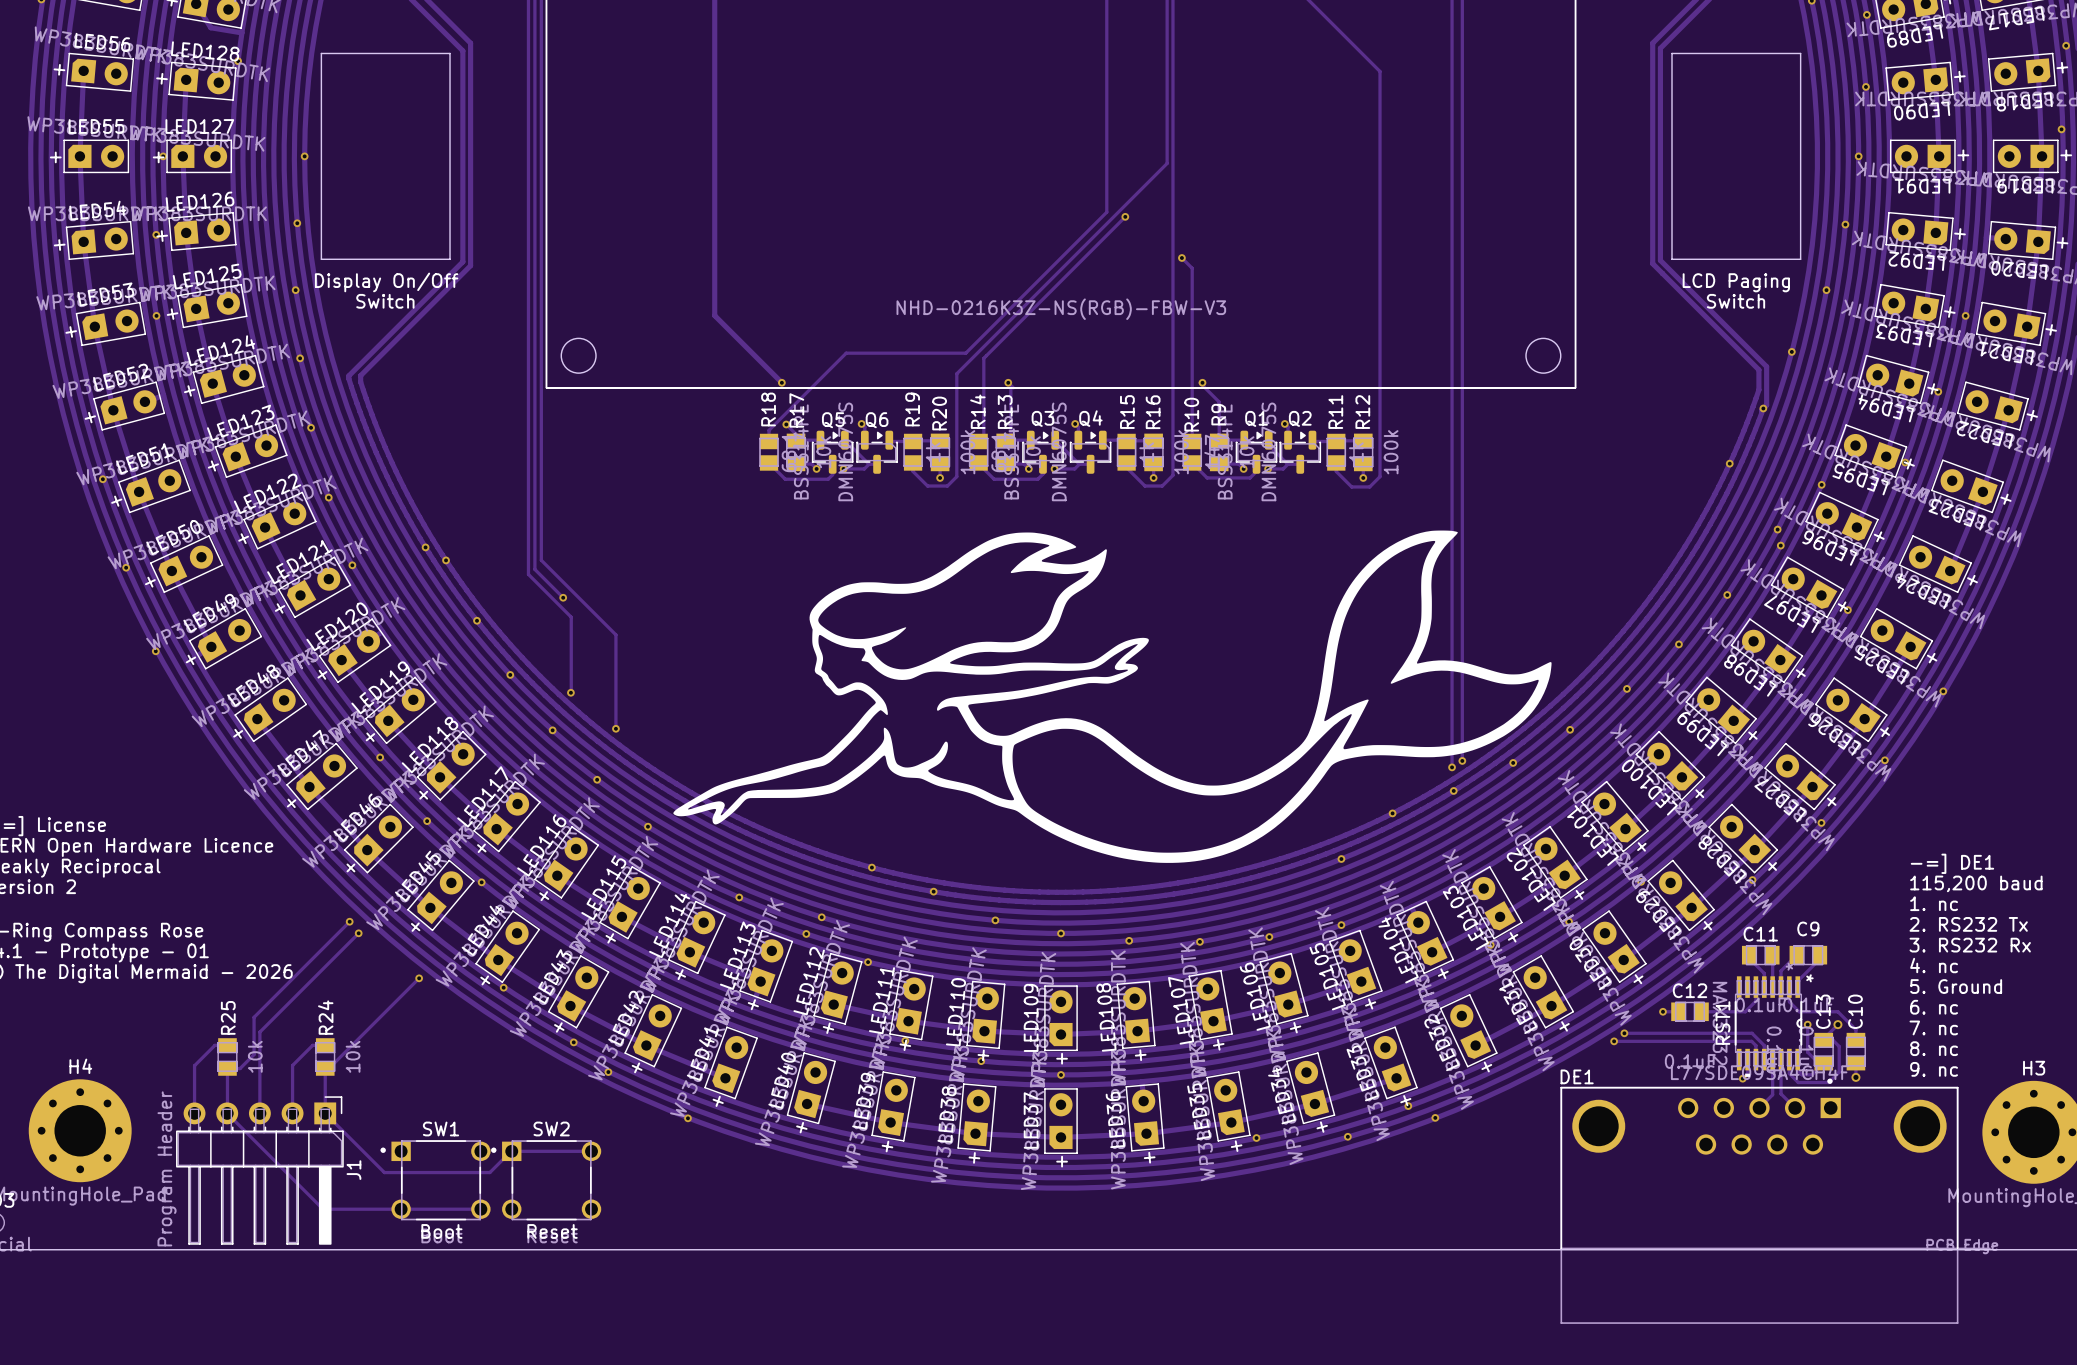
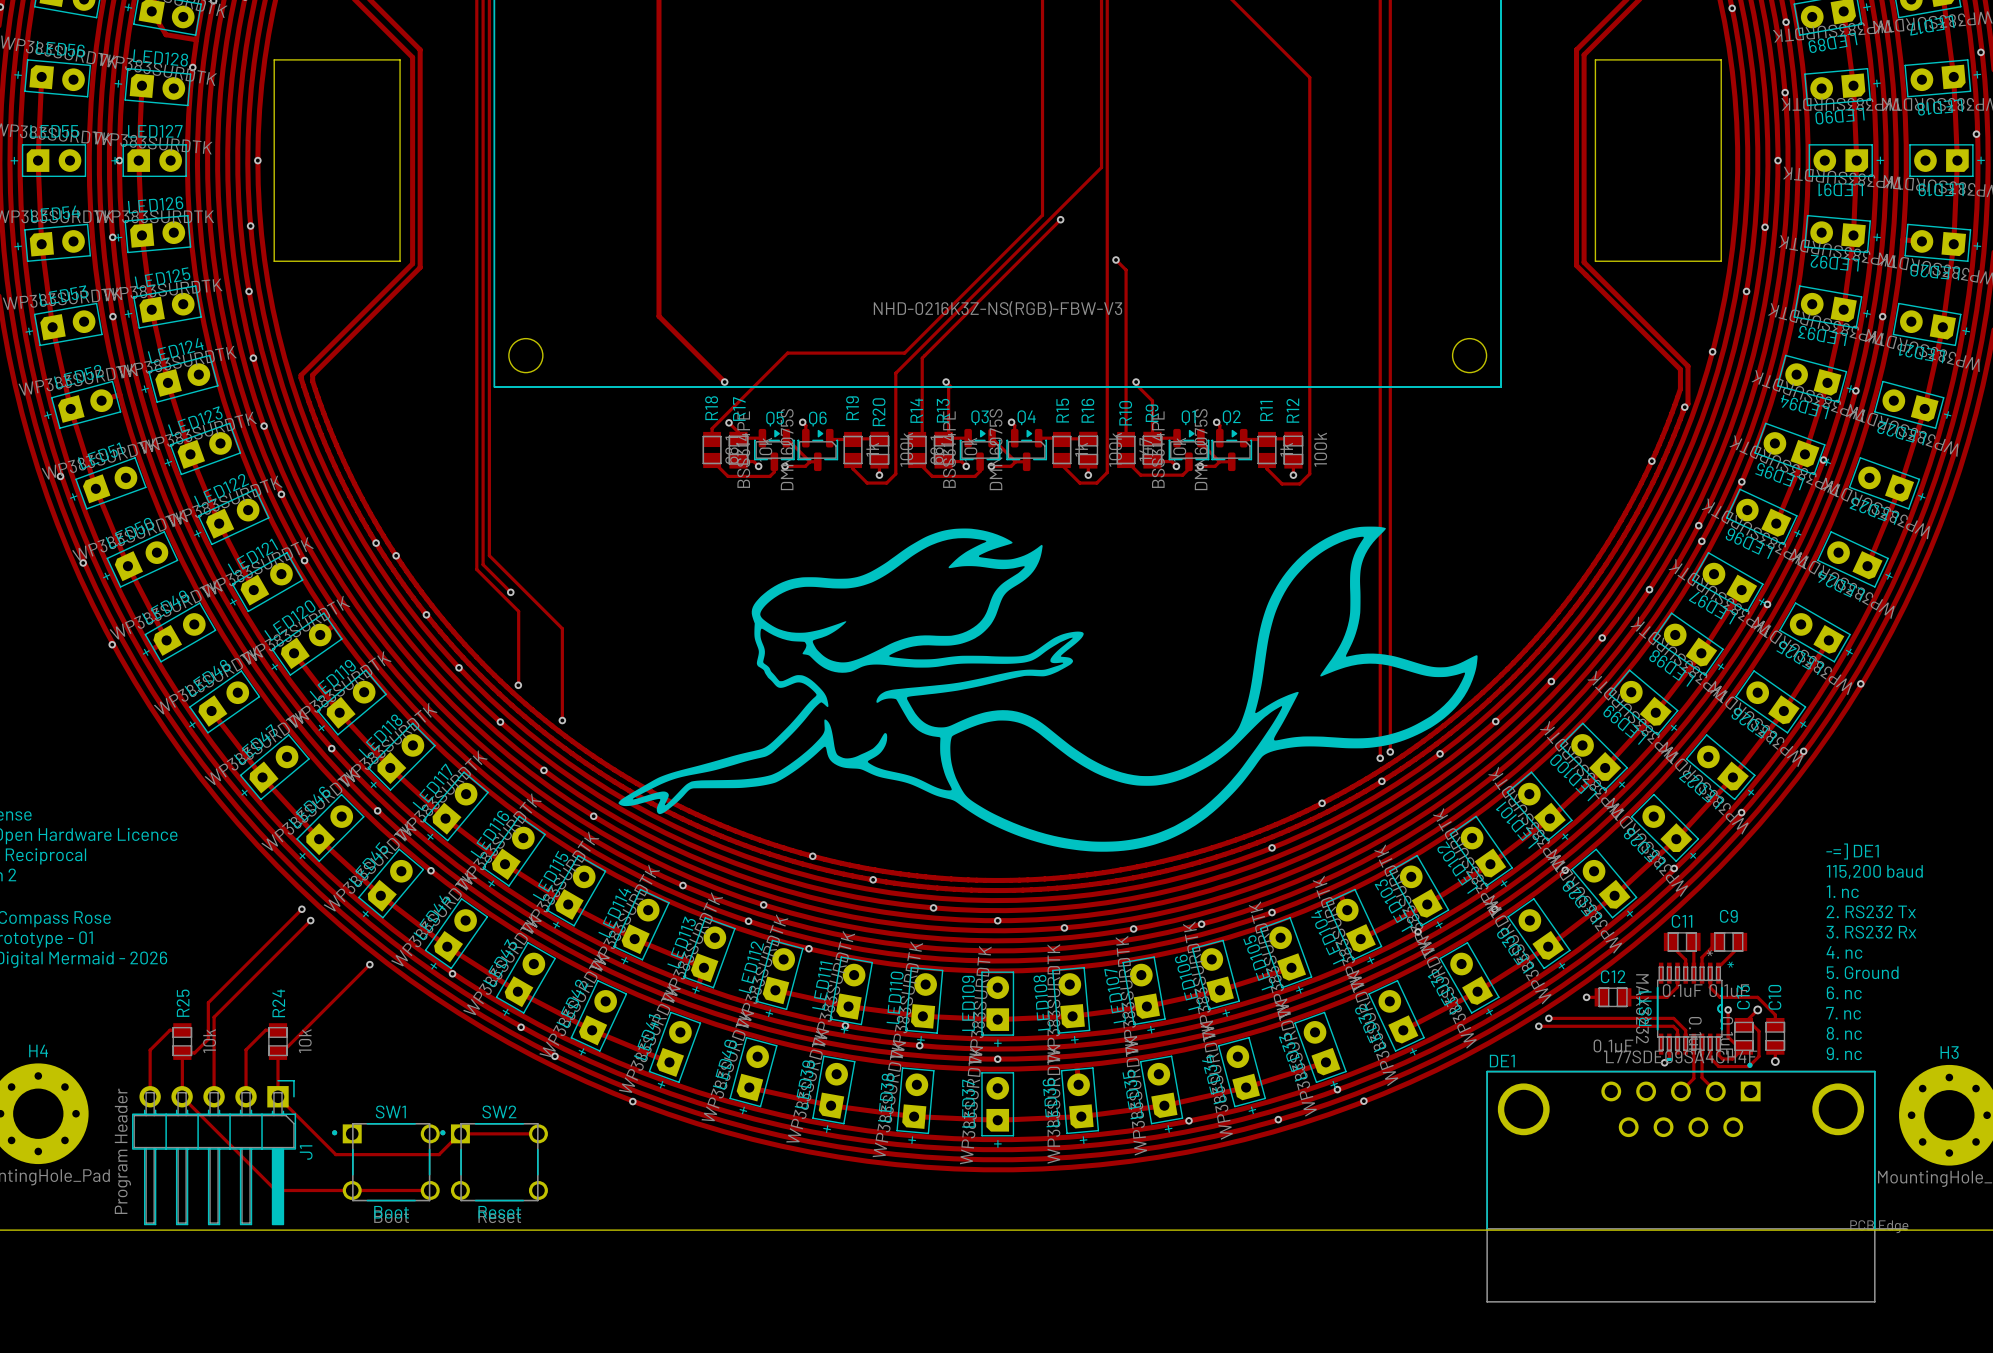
text: Display On/Off (386, 282) -> none
text: LCD Paging (1736, 282) -> none
text: Switch (385, 301) -> none
text: Switch (1736, 301) -> none

